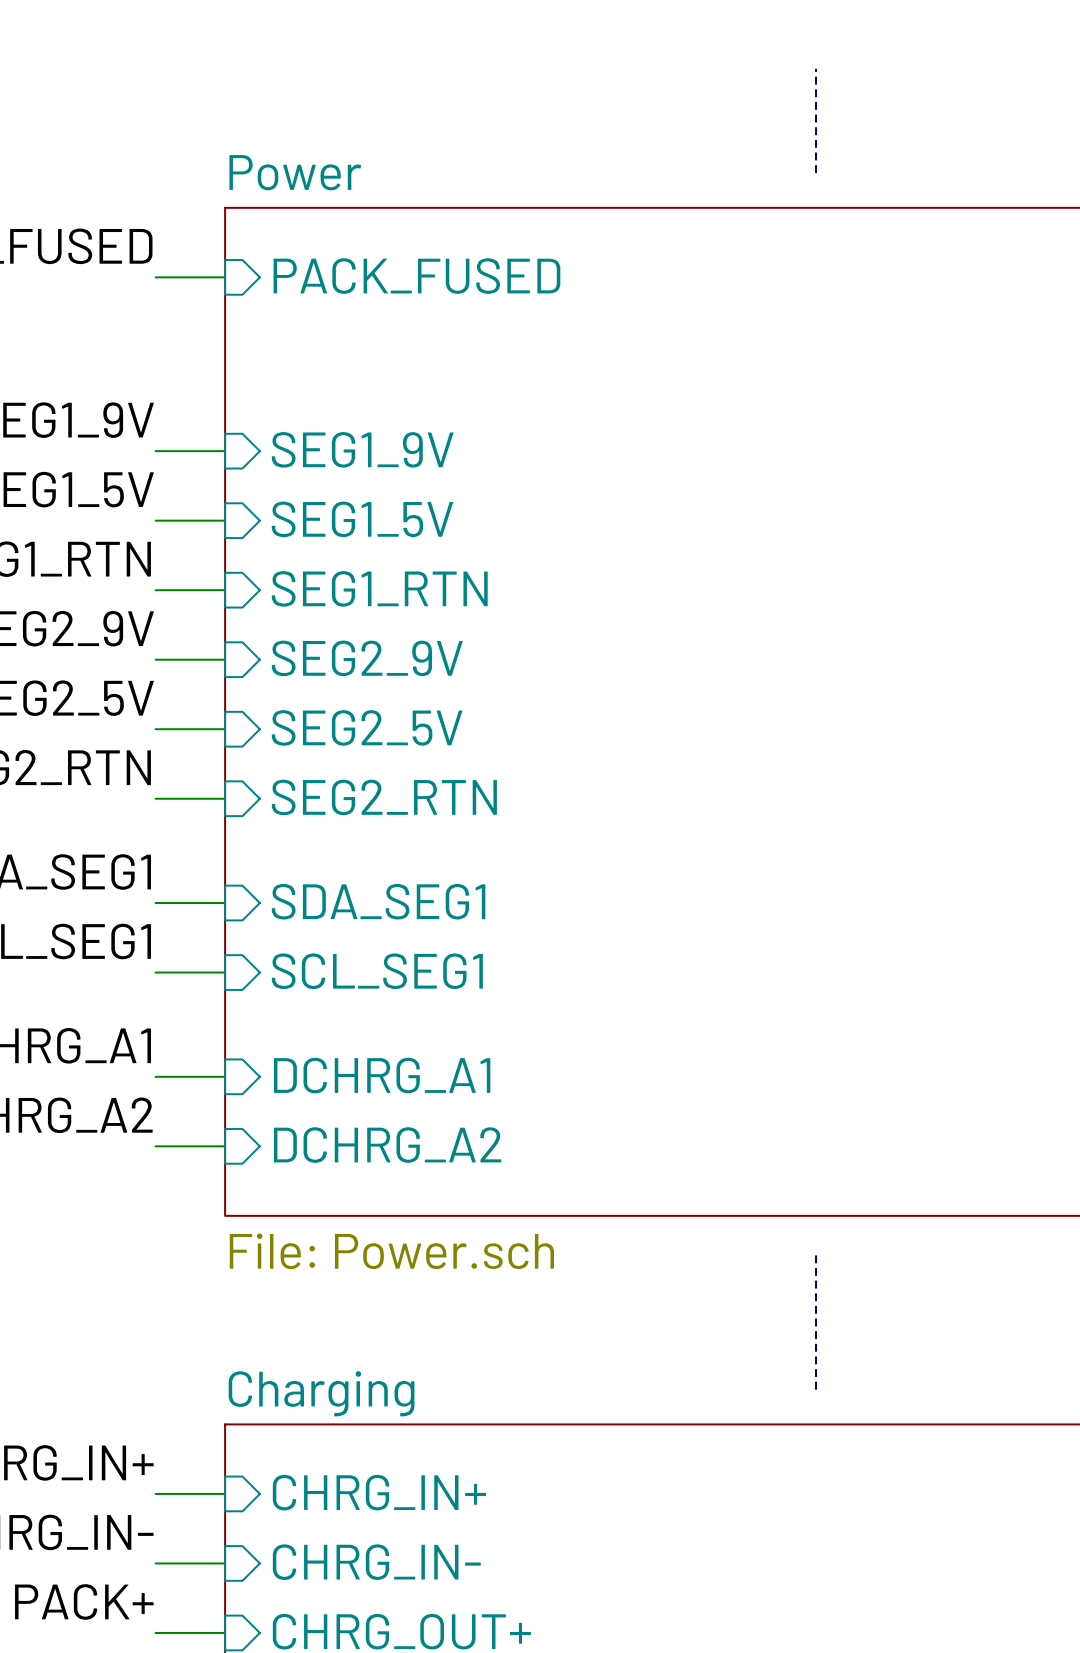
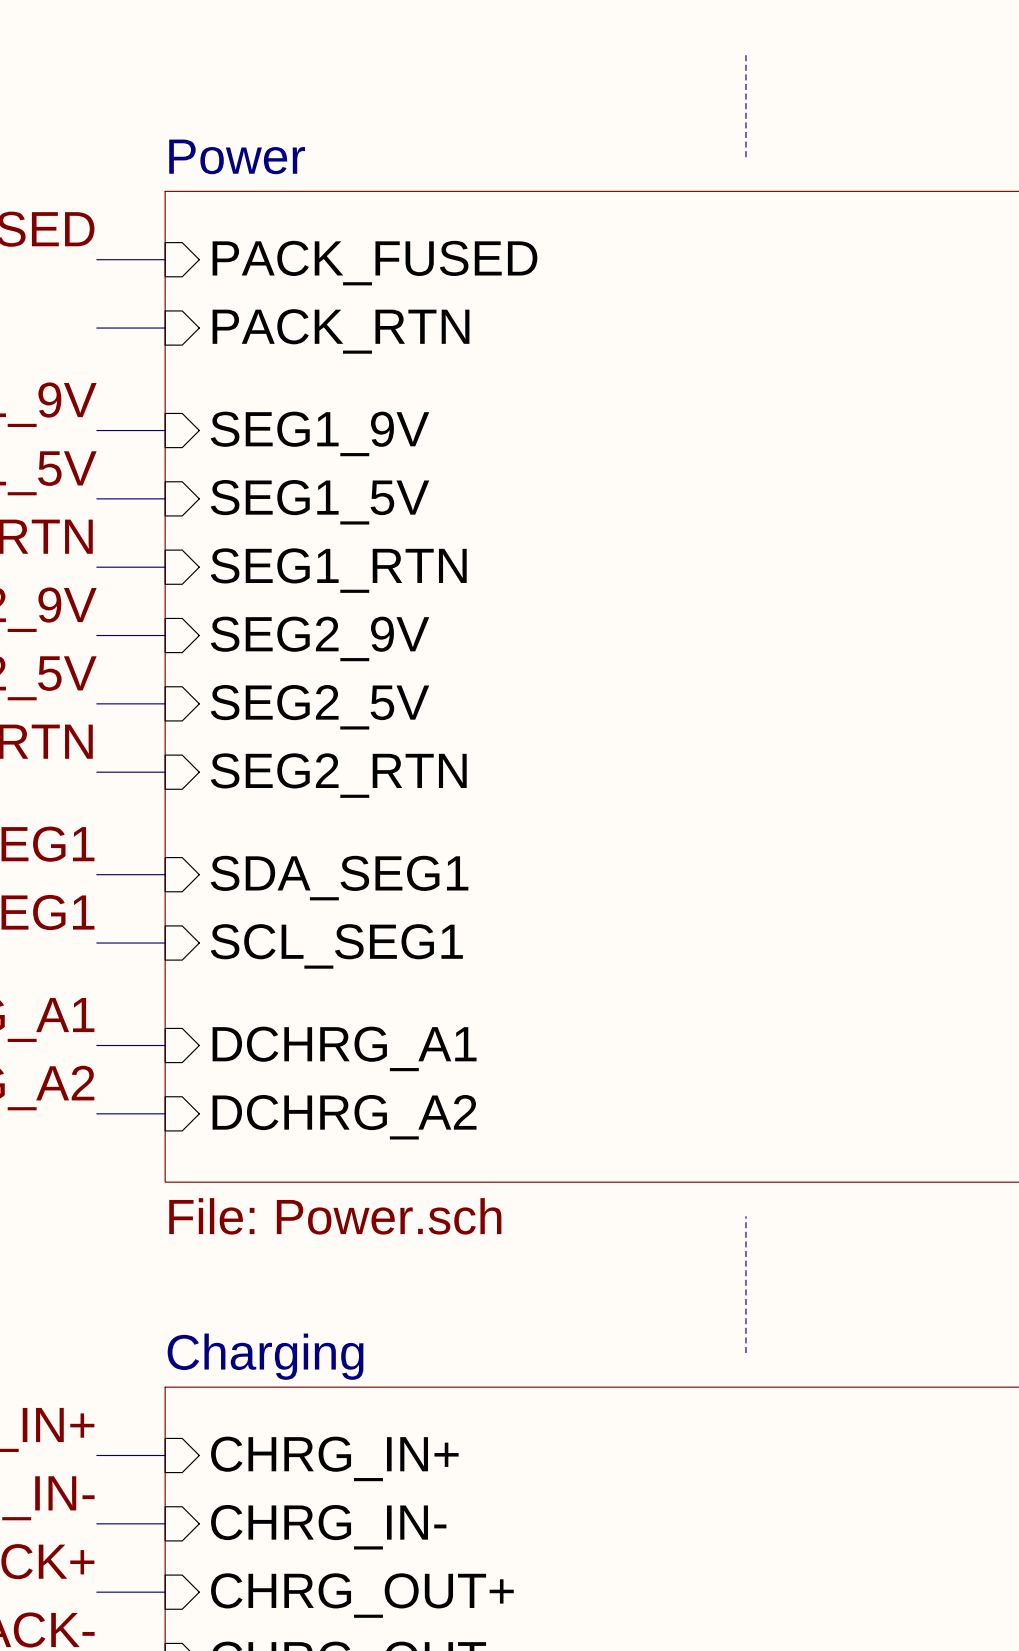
sheet pin: none -> PACK_RTN (341, 331)
wire: none -> (96, 328) (165, 328)

